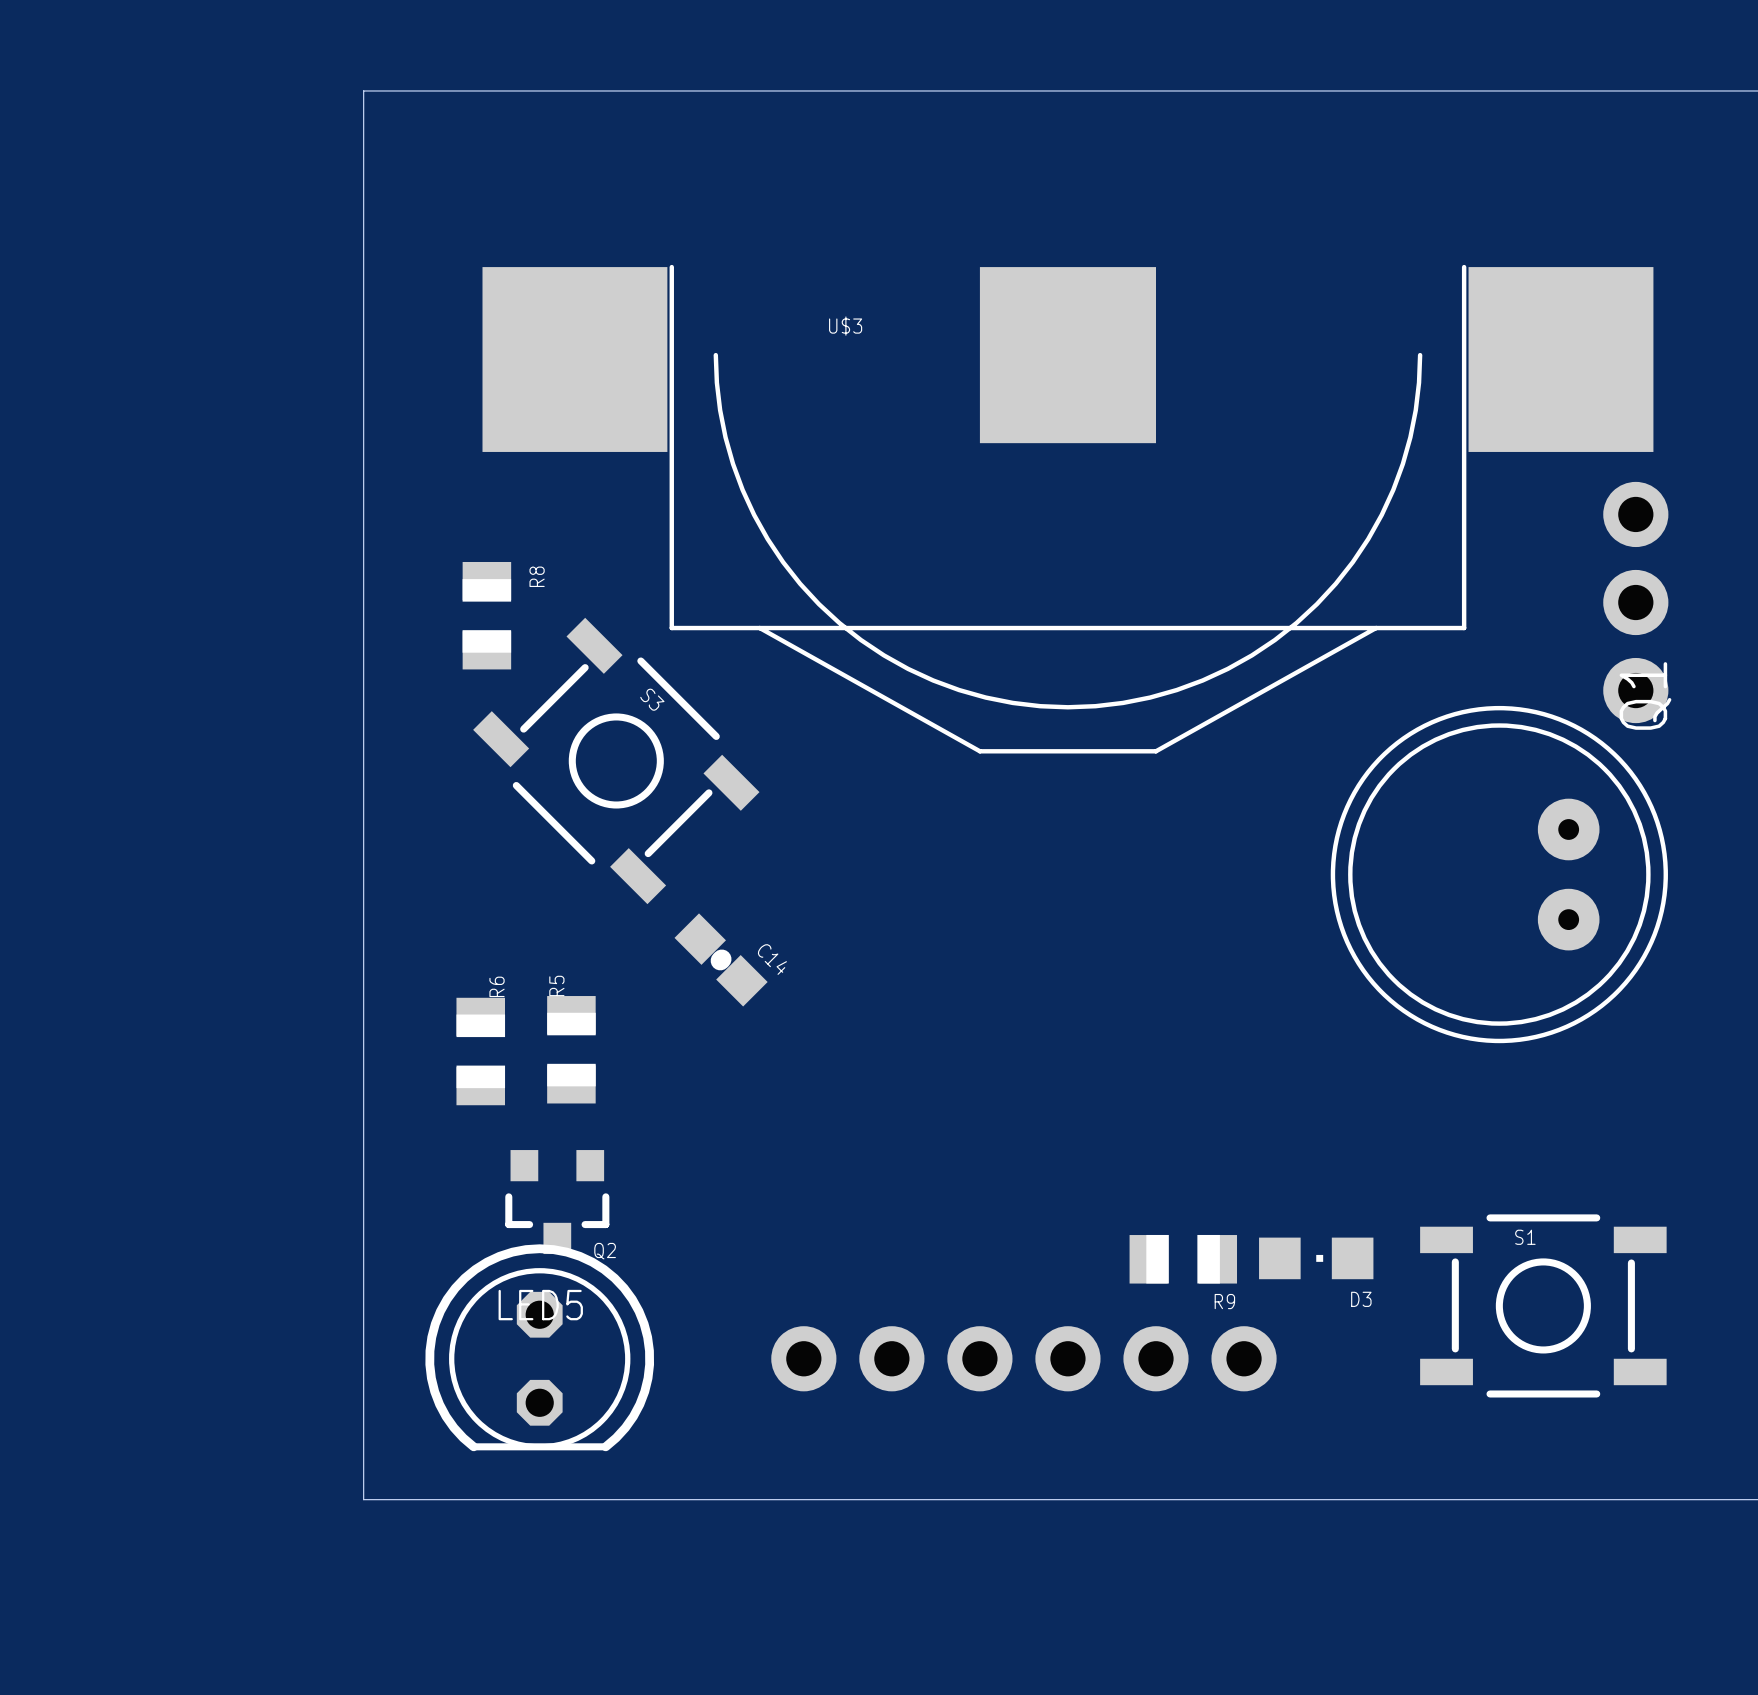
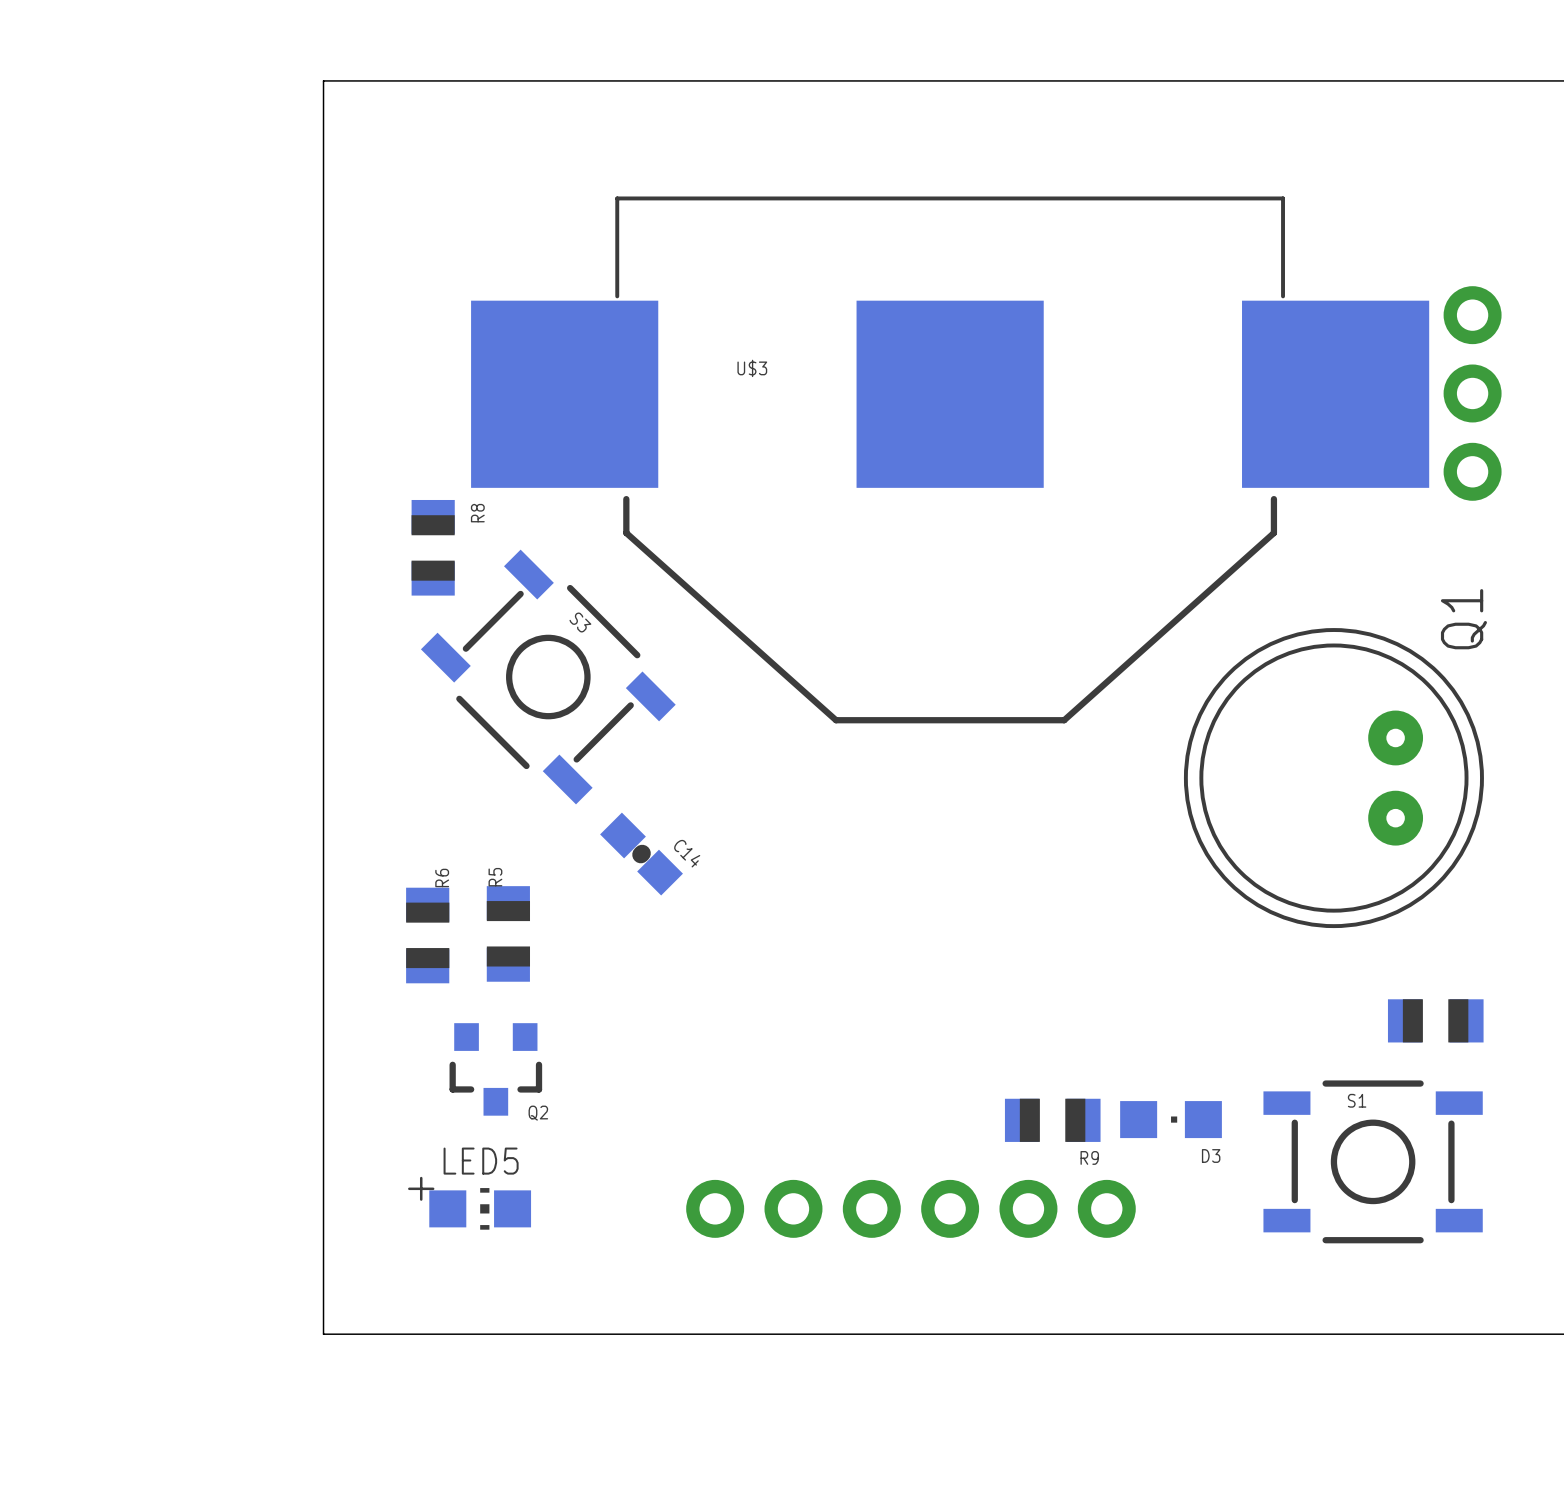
U$3 footprint: [482, 264, 1654, 754] -> [471, 196, 1430, 724]
U$3 name position: U$3 (845, 326) -> U$3 (752, 368)
part position: (1635, 602) -> (1472, 393)
part: none -> (1435, 1020)
LED5 footprint: [425, 1244, 655, 1452] -> [429, 1188, 532, 1230]

